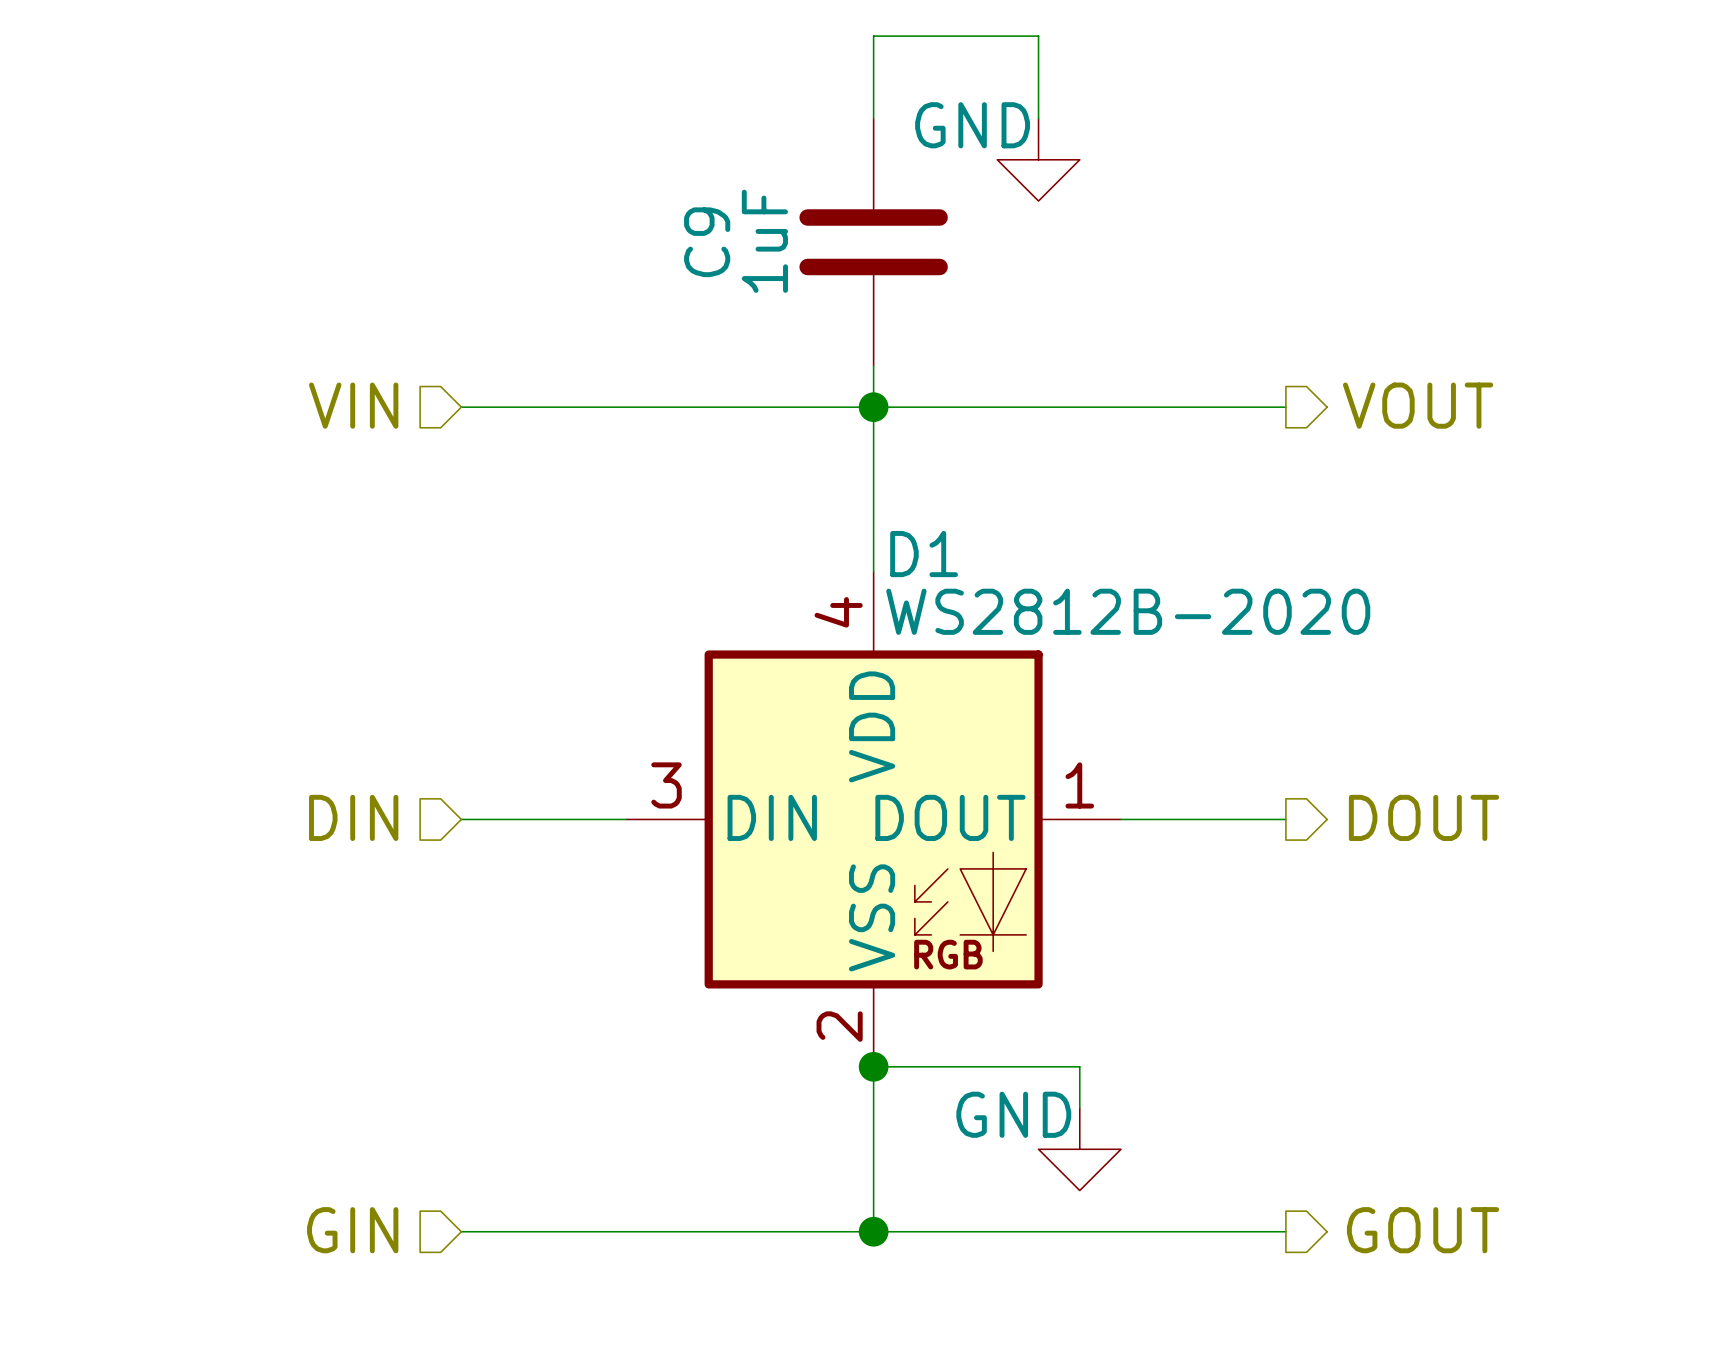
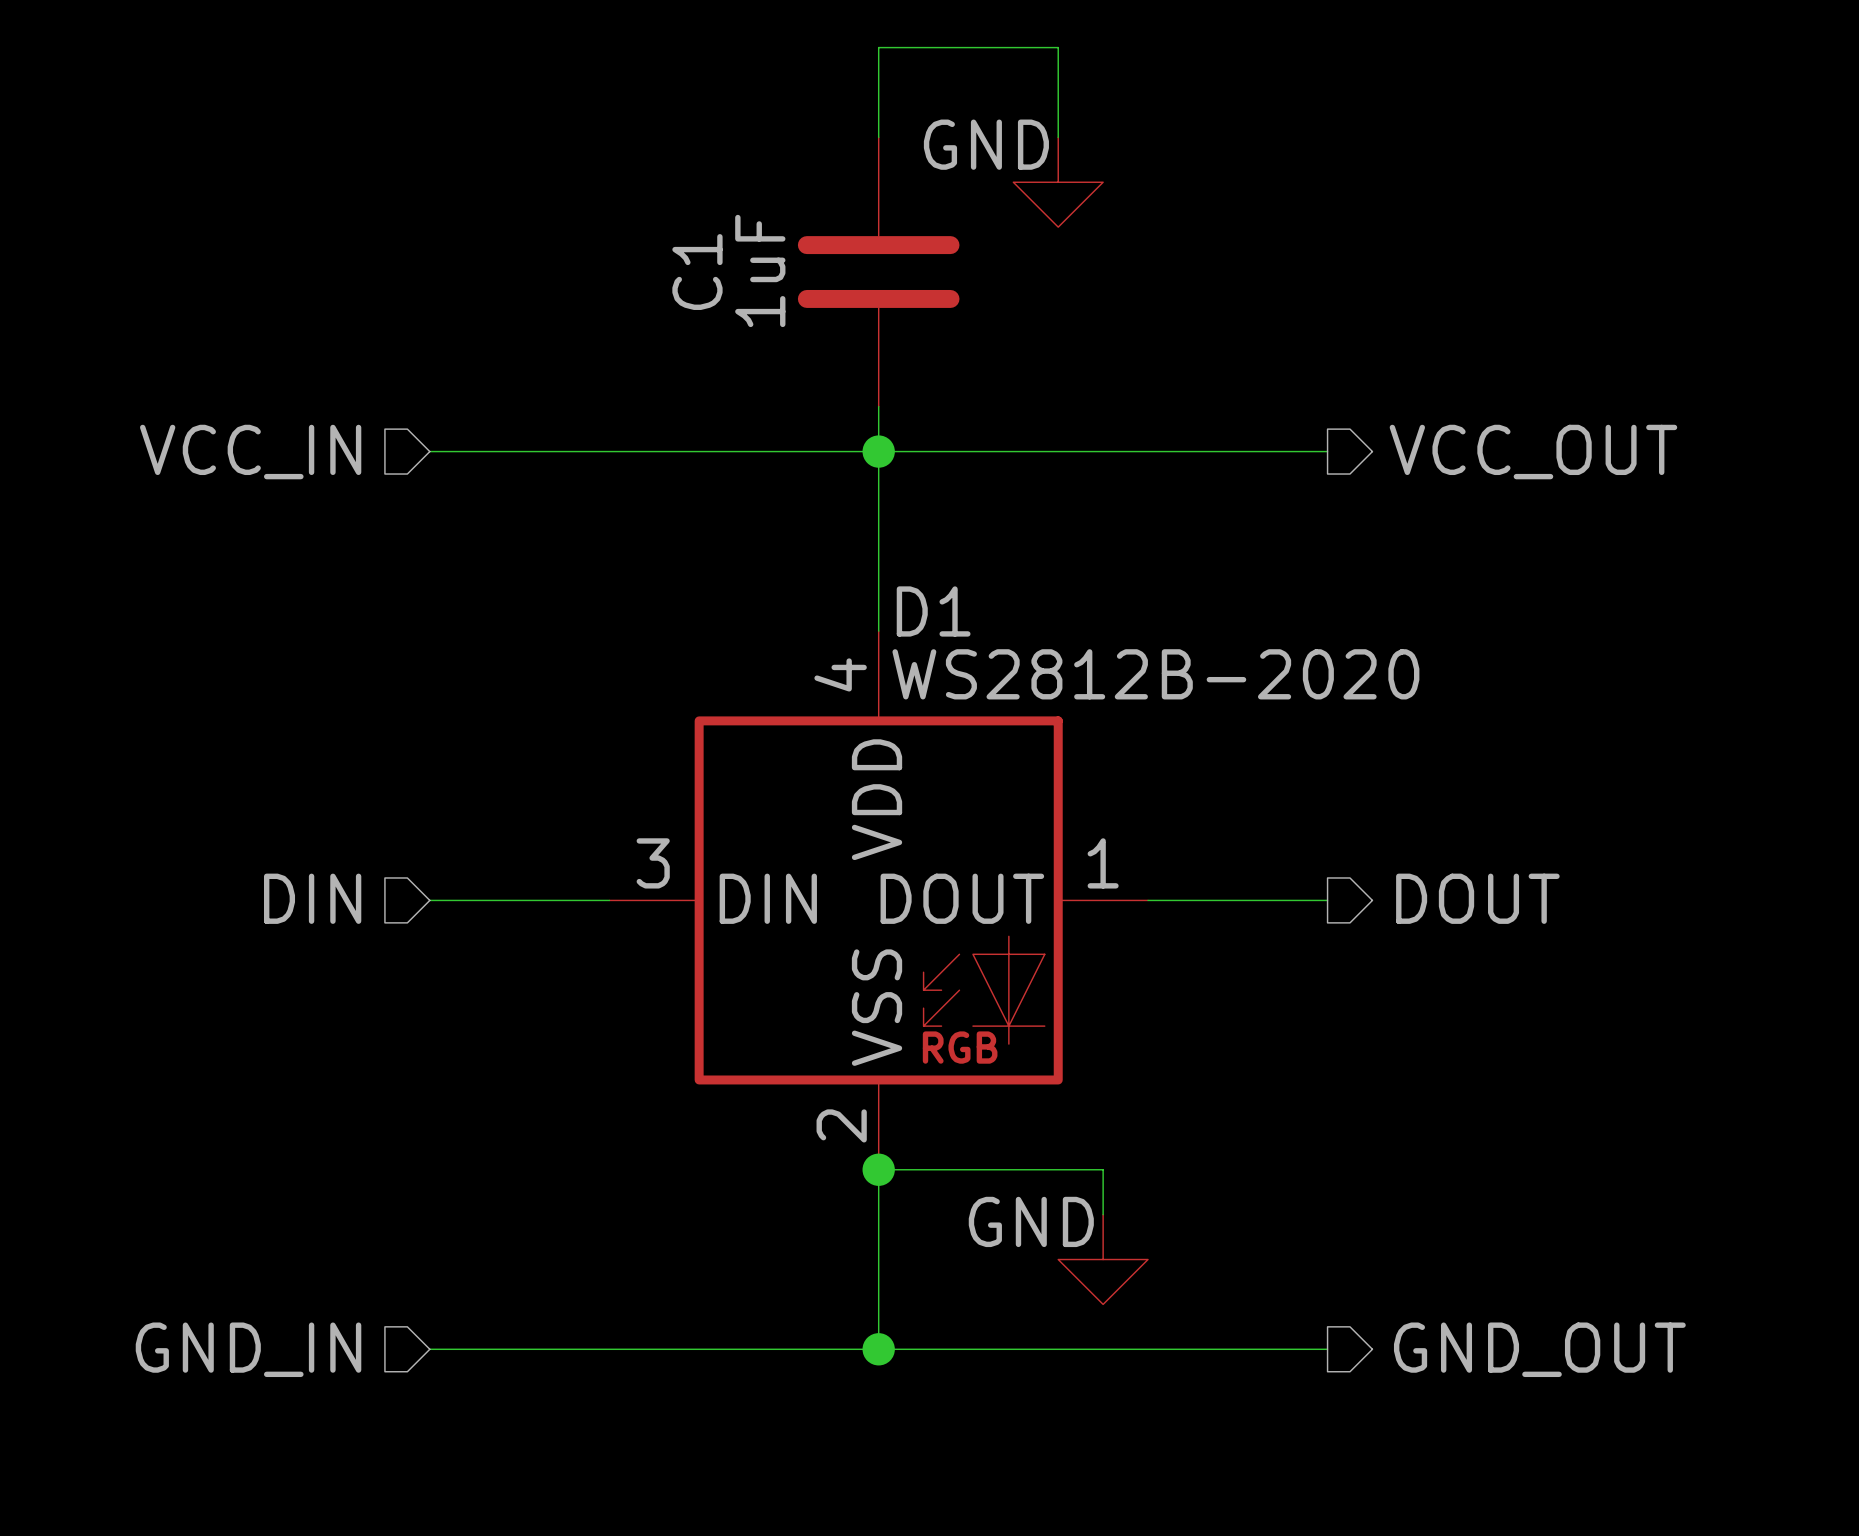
C9 name: C9 (707, 242) -> C1 (697, 272)
hierarchical label: VIN (353, 405) -> VCC_IN (250, 452)
hierarchical label: VOUT (1418, 405) -> VCC_OUT (1533, 452)
hierarchical label: GIN (352, 1230) -> GND_IN (248, 1349)
hierarchical label: GOUT (1423, 1230) -> GND_OUT (1539, 1349)

